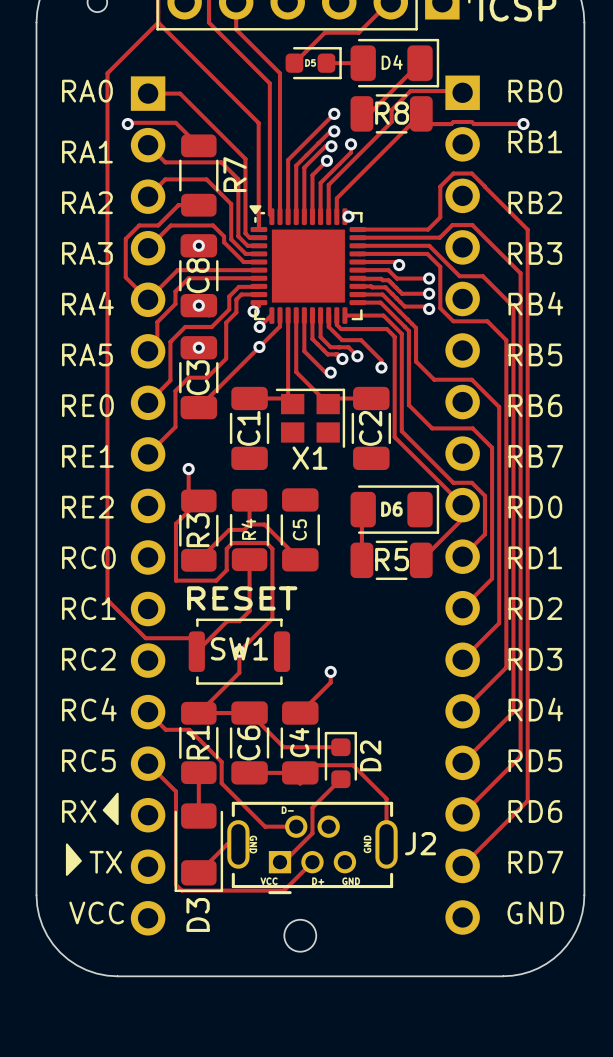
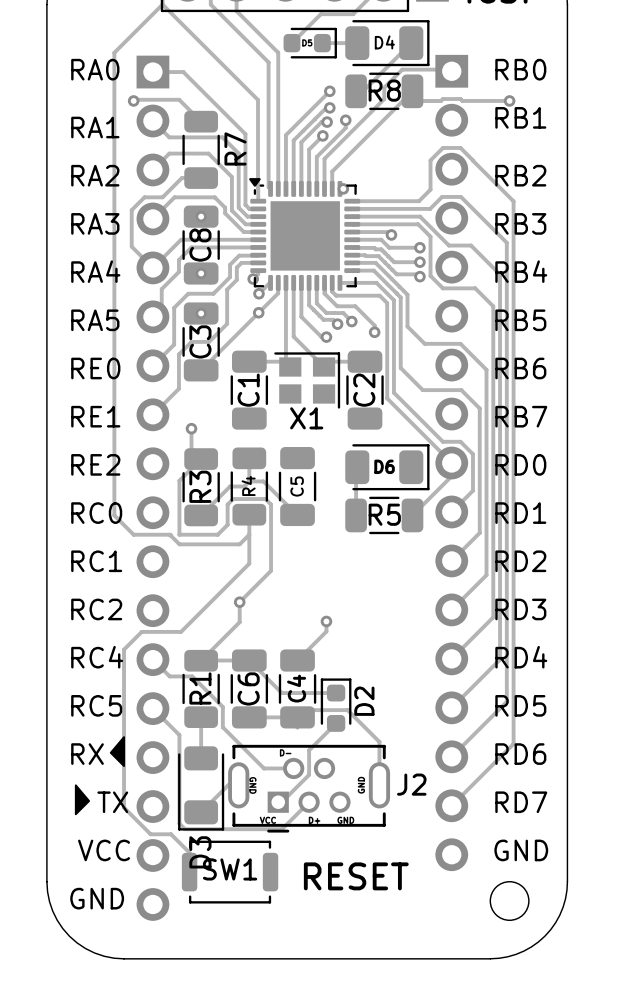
part: (148, 505) -> none
part: none -> (152, 488)
track: (107, 560) (107, 600) (145, 638) (196, 638) -> (114, 515) (133, 534) (169, 534) (179, 544) (239, 544) (249, 534)
text position: RESET (242, 598) -> RESET (356, 876)
track: (239, 621) (227, 621) (196, 651) -> (239, 573) (181, 631) (141, 631) (124, 649) (124, 807) (150, 834) (171, 834) (189, 852) (189, 872)
SW1 position: (239, 651) -> (230, 872)
board edge: (36, 895) (42, 926) (60, 952) (77, 965) (107, 975) (503, 976) -> (46, 833) (47, 891) (52, 911) (69, 936) (85, 948) (104, 956) (124, 958) (490, 958)
board edge: (584, 895) (582, 913) (576, 930) (560, 952) (546, 963) (530, 971) (503, 976) -> (567, 833) (566, 890) (563, 907) (555, 922) (544, 936) (531, 946) (515, 954) (490, 958)
round board edge: [283, 919, 317, 953] -> none
round board edge: none -> [489, 881, 530, 921]
text: none -> GND (97, 898)

